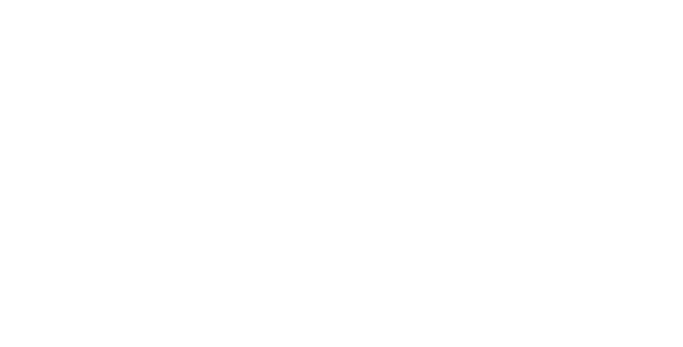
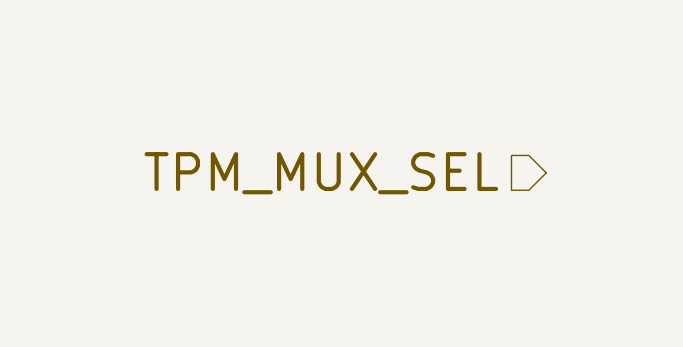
hierarchical label: none -> TPM_MUX_SEL (321, 173)

